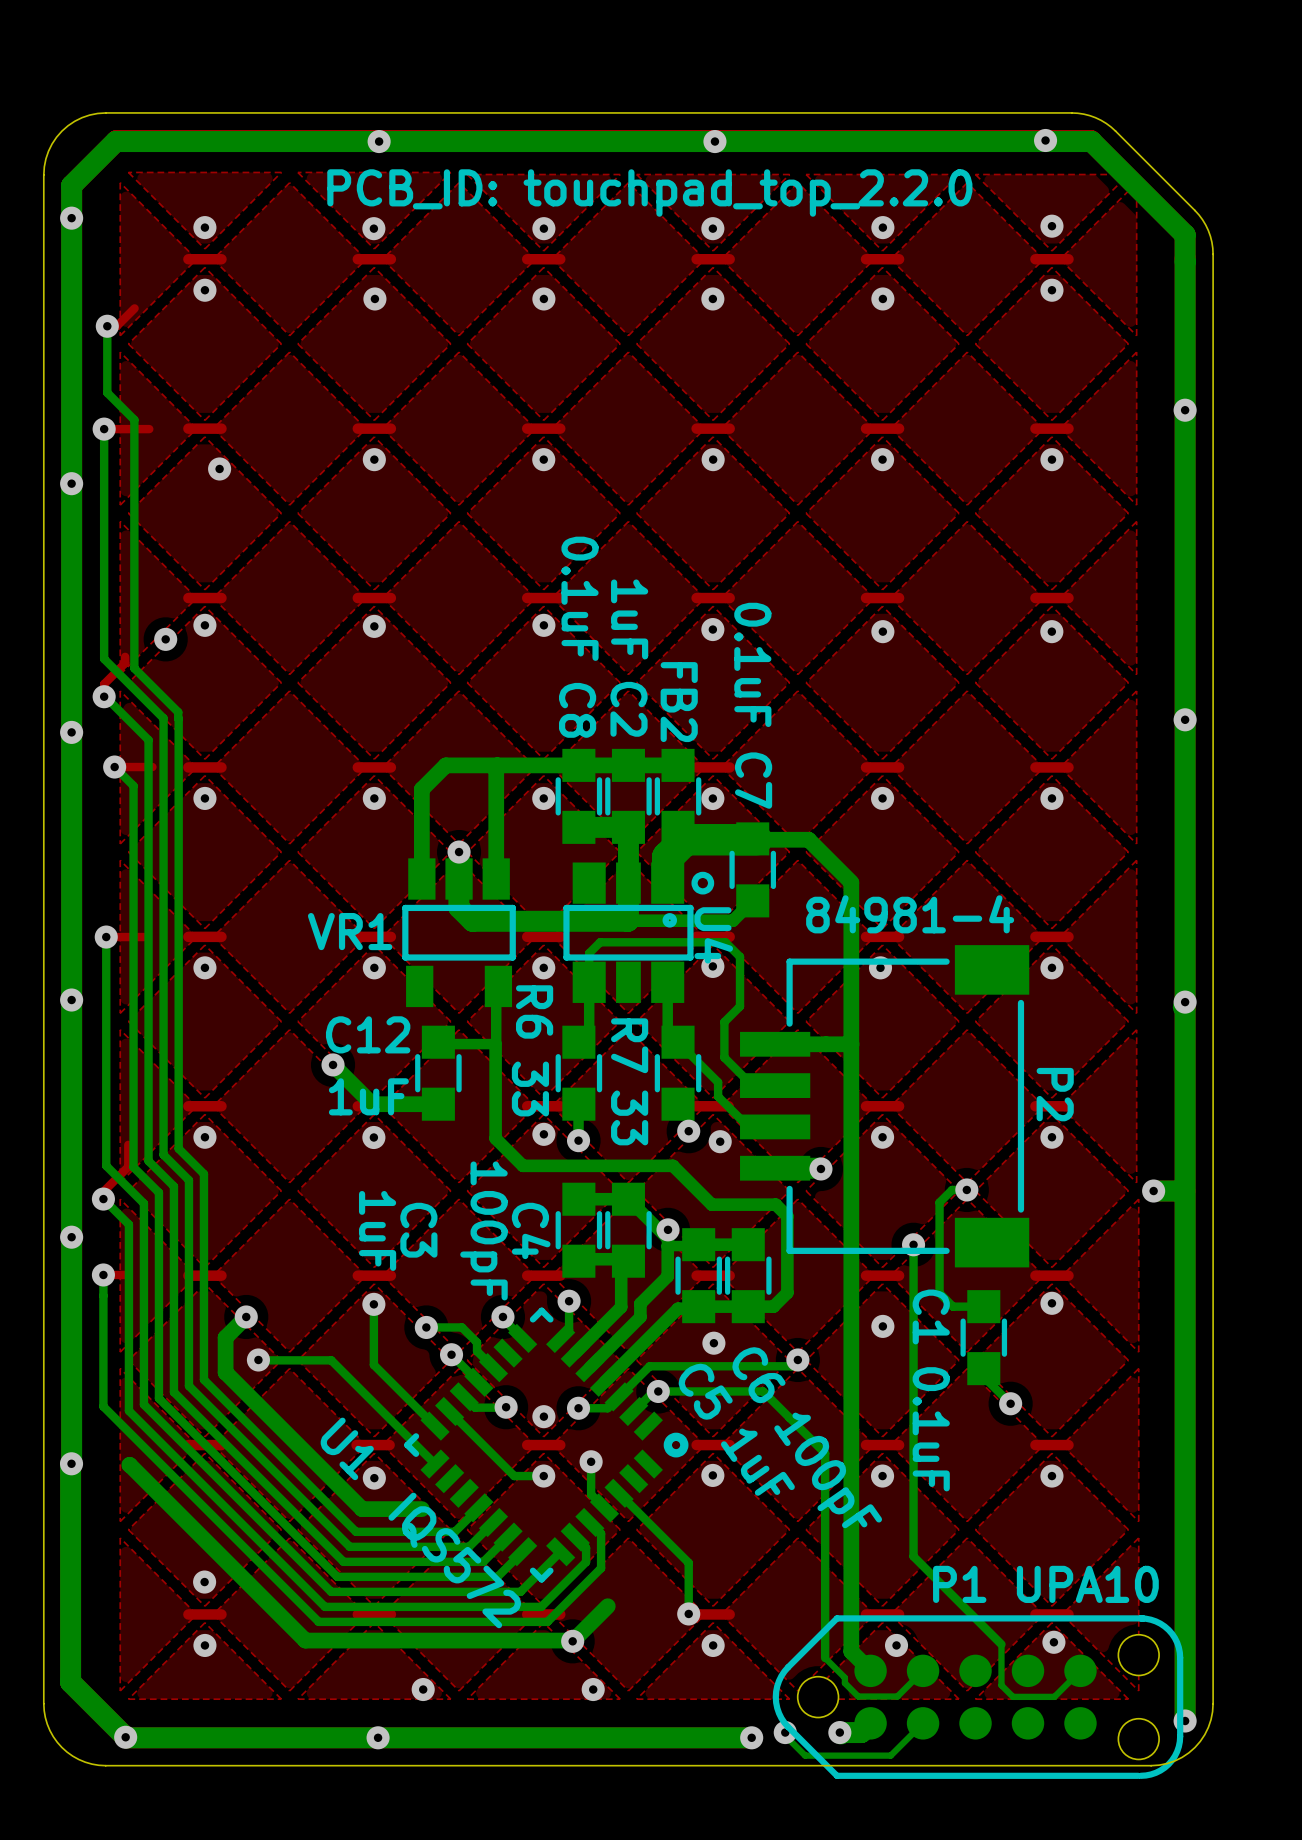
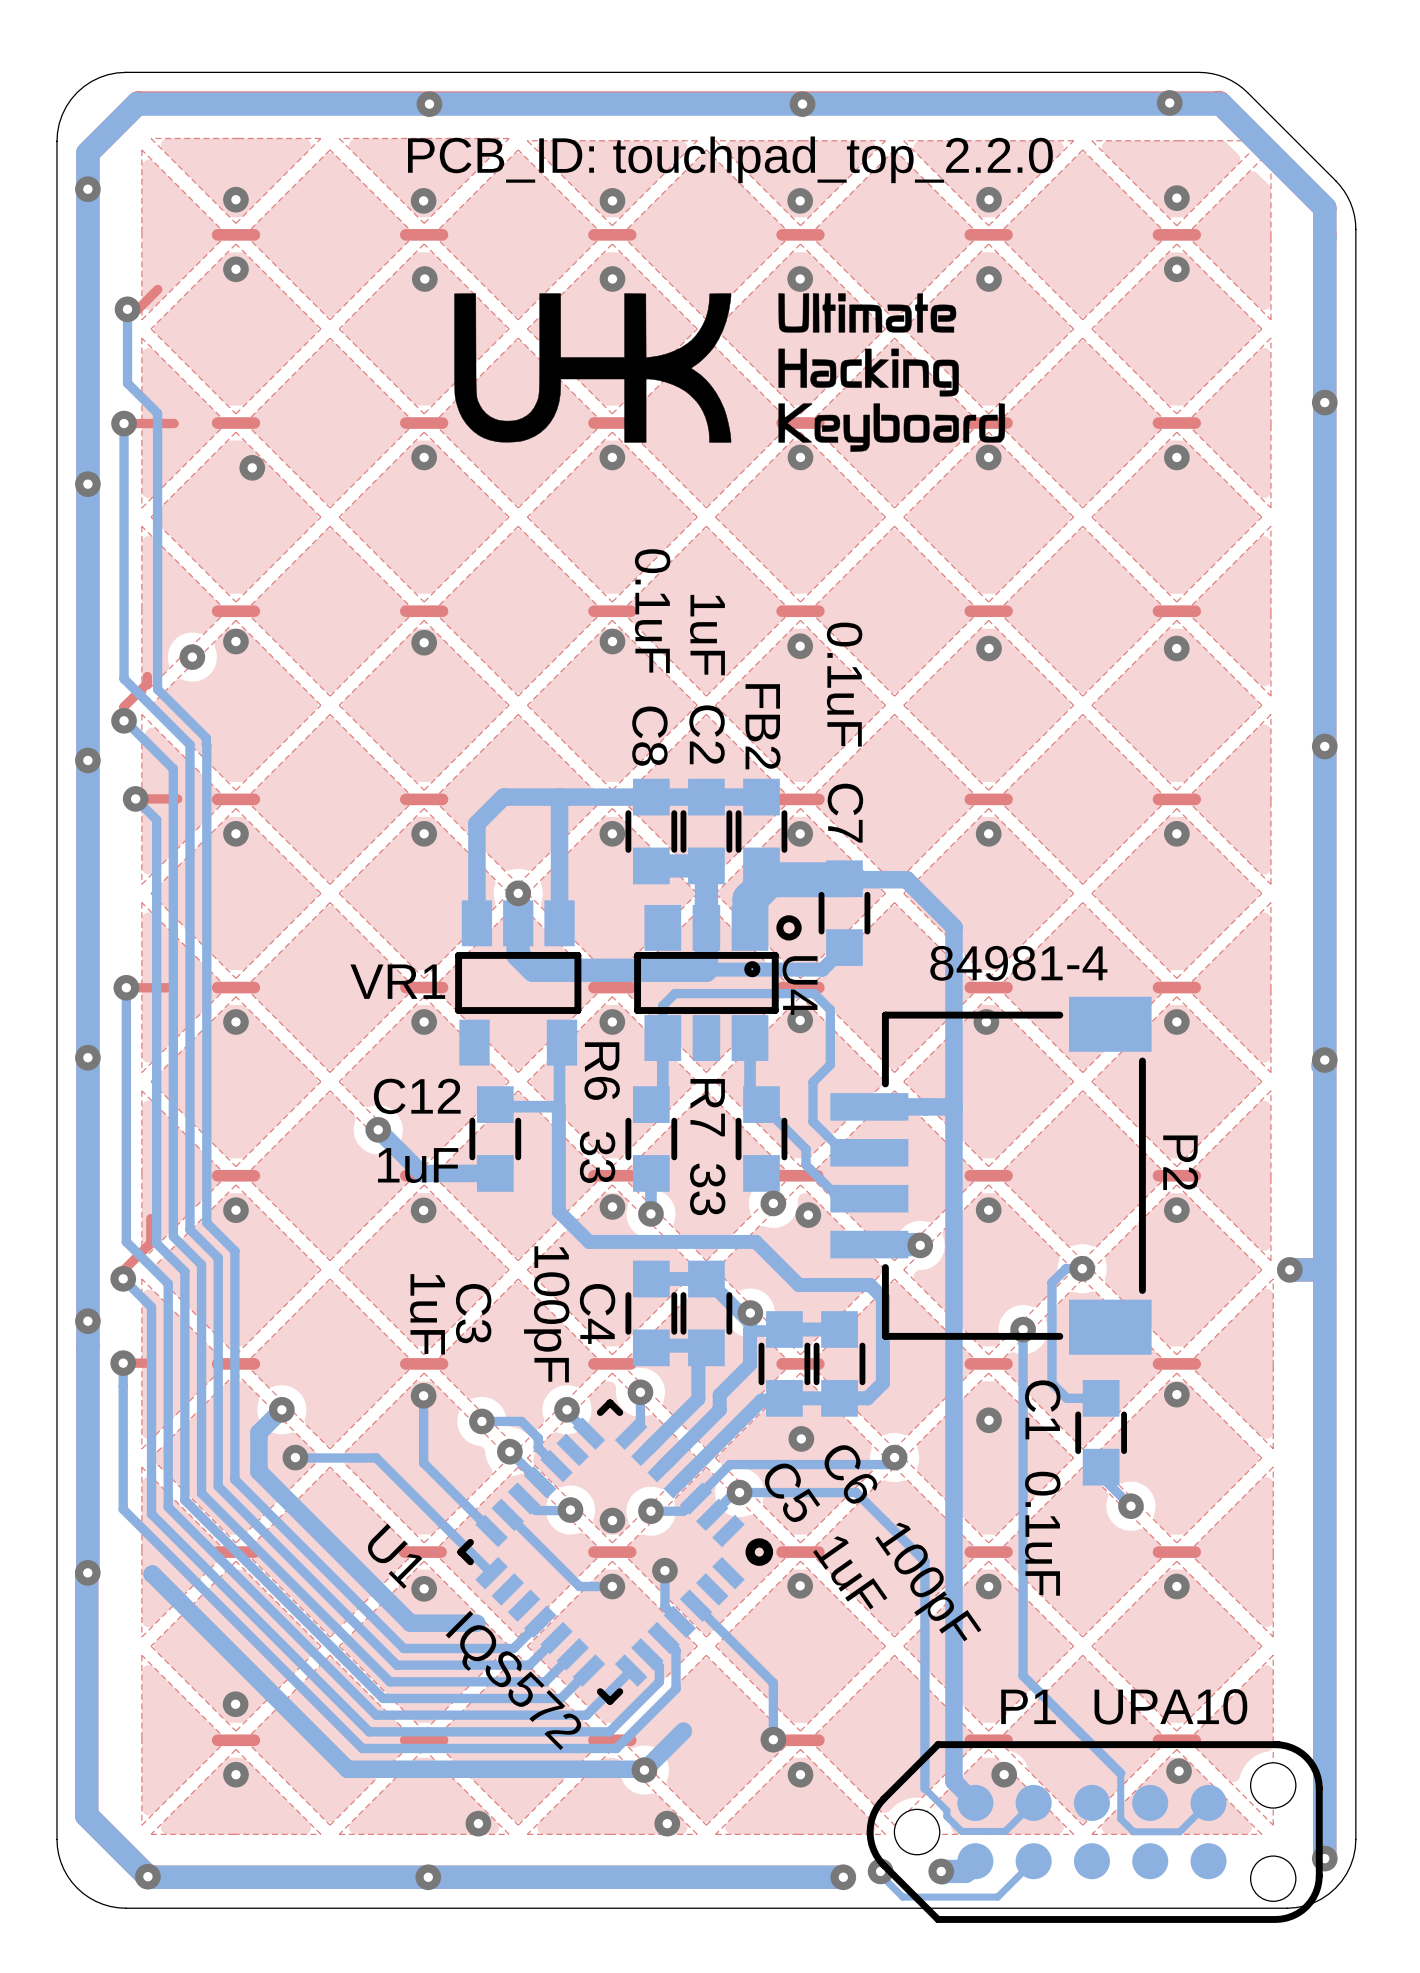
drawing: none -> [454, 293, 1006, 452]
P1 name position: P1 (959, 1584) -> P1 (1028, 1706)
text position: UPA10 (1087, 1584) -> UPA10 (1170, 1706)

